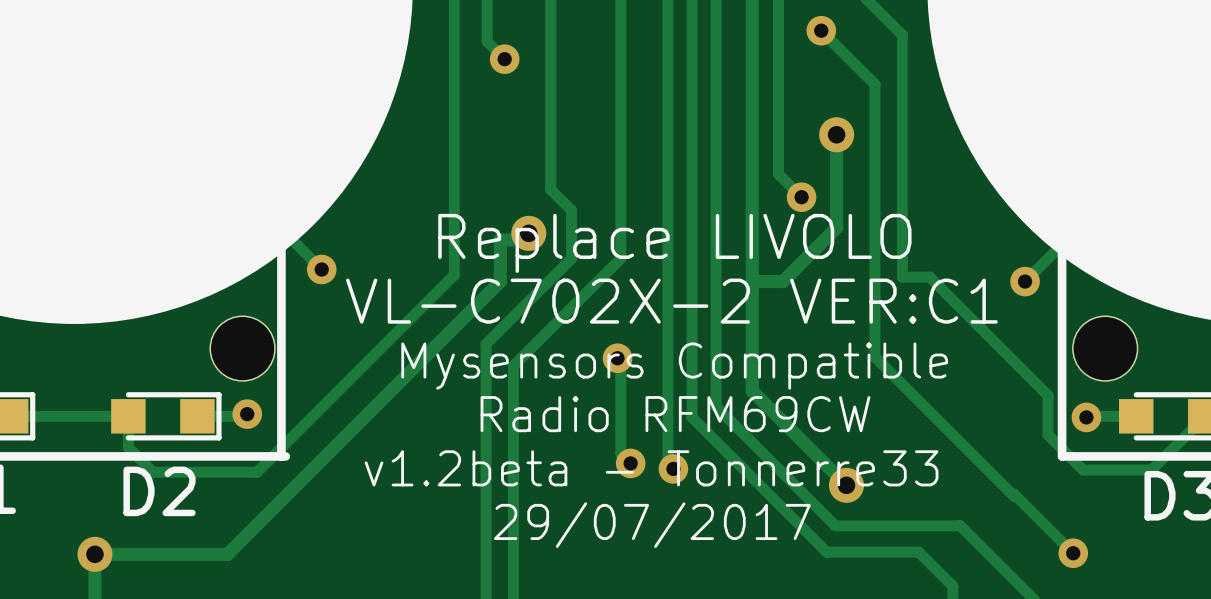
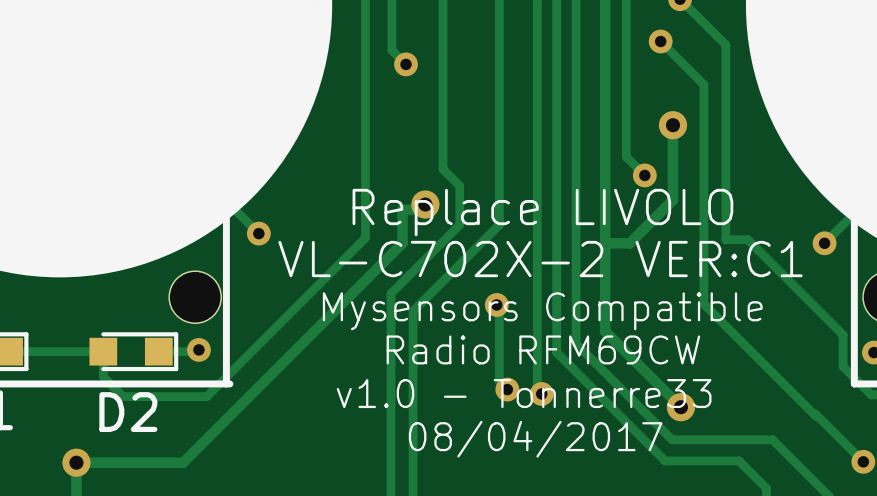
text: v1.2beta - Tonnerre33 (651, 468) -> v1.0 - Tonnerre33 (524, 393)
text: 29/07/2017 (652, 525) -> 08/04/2017 (535, 439)

